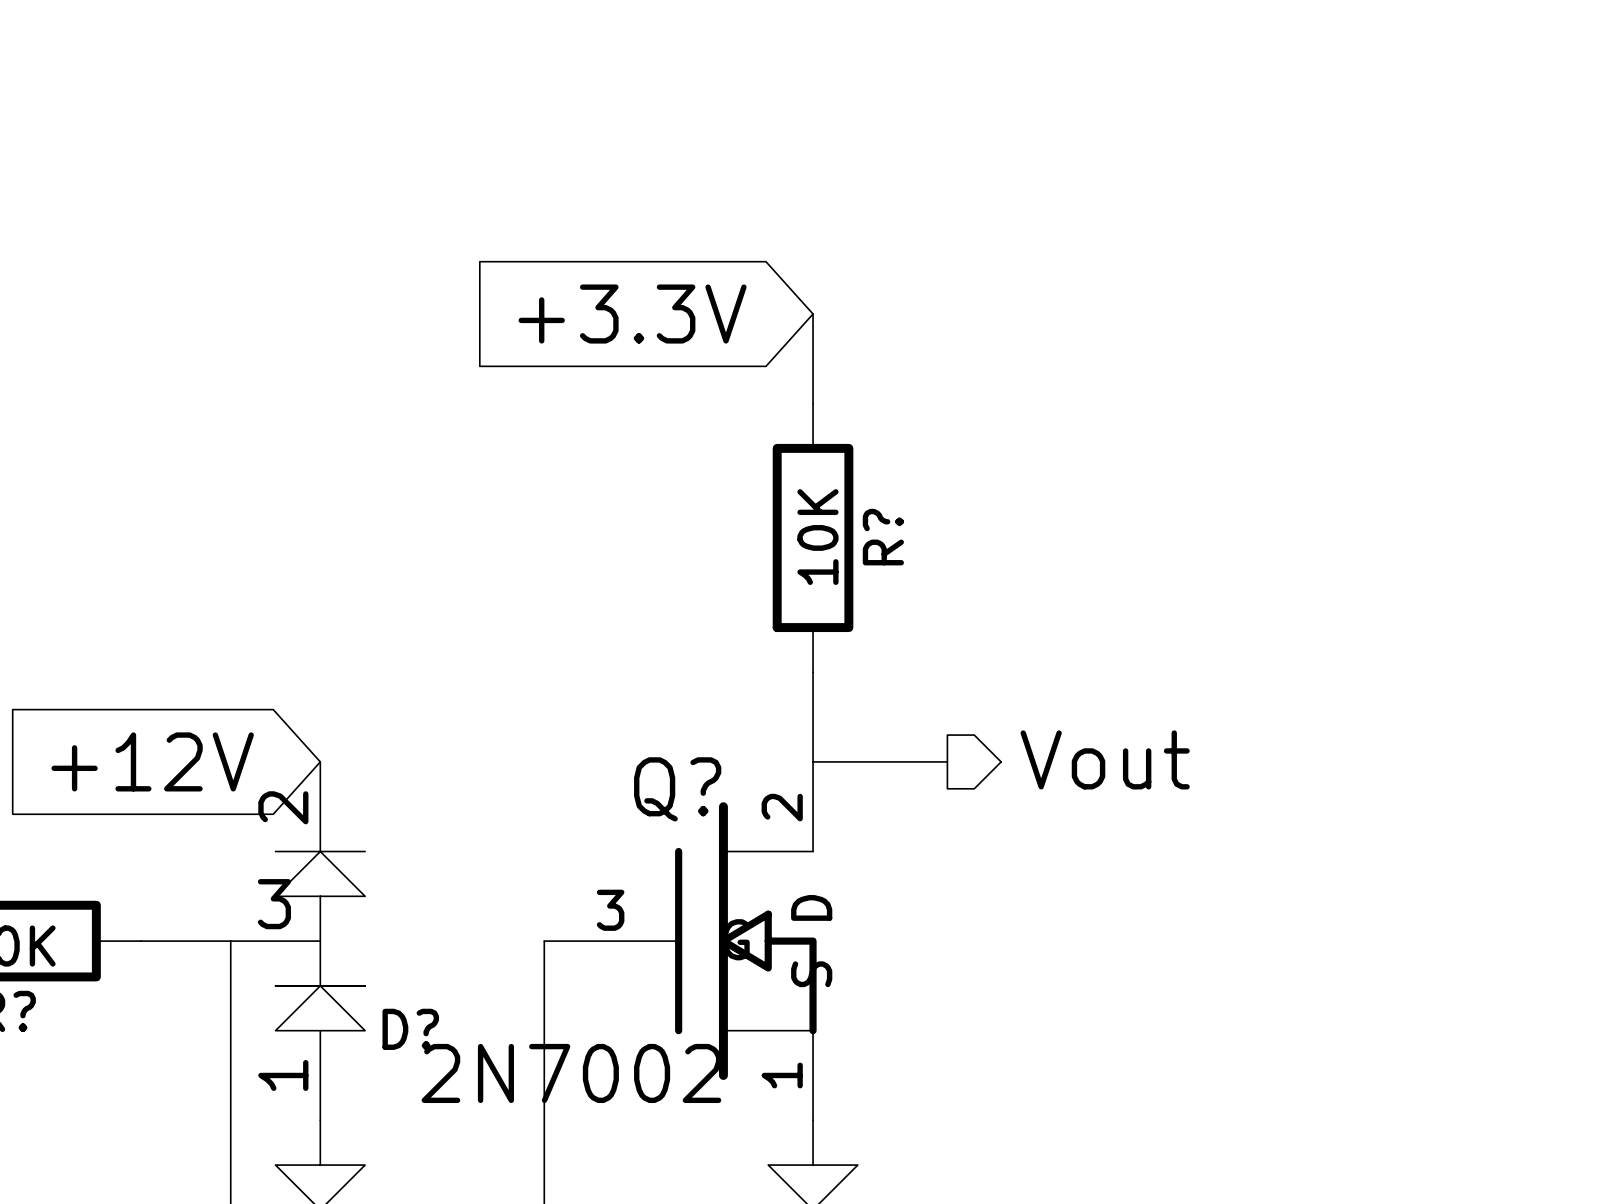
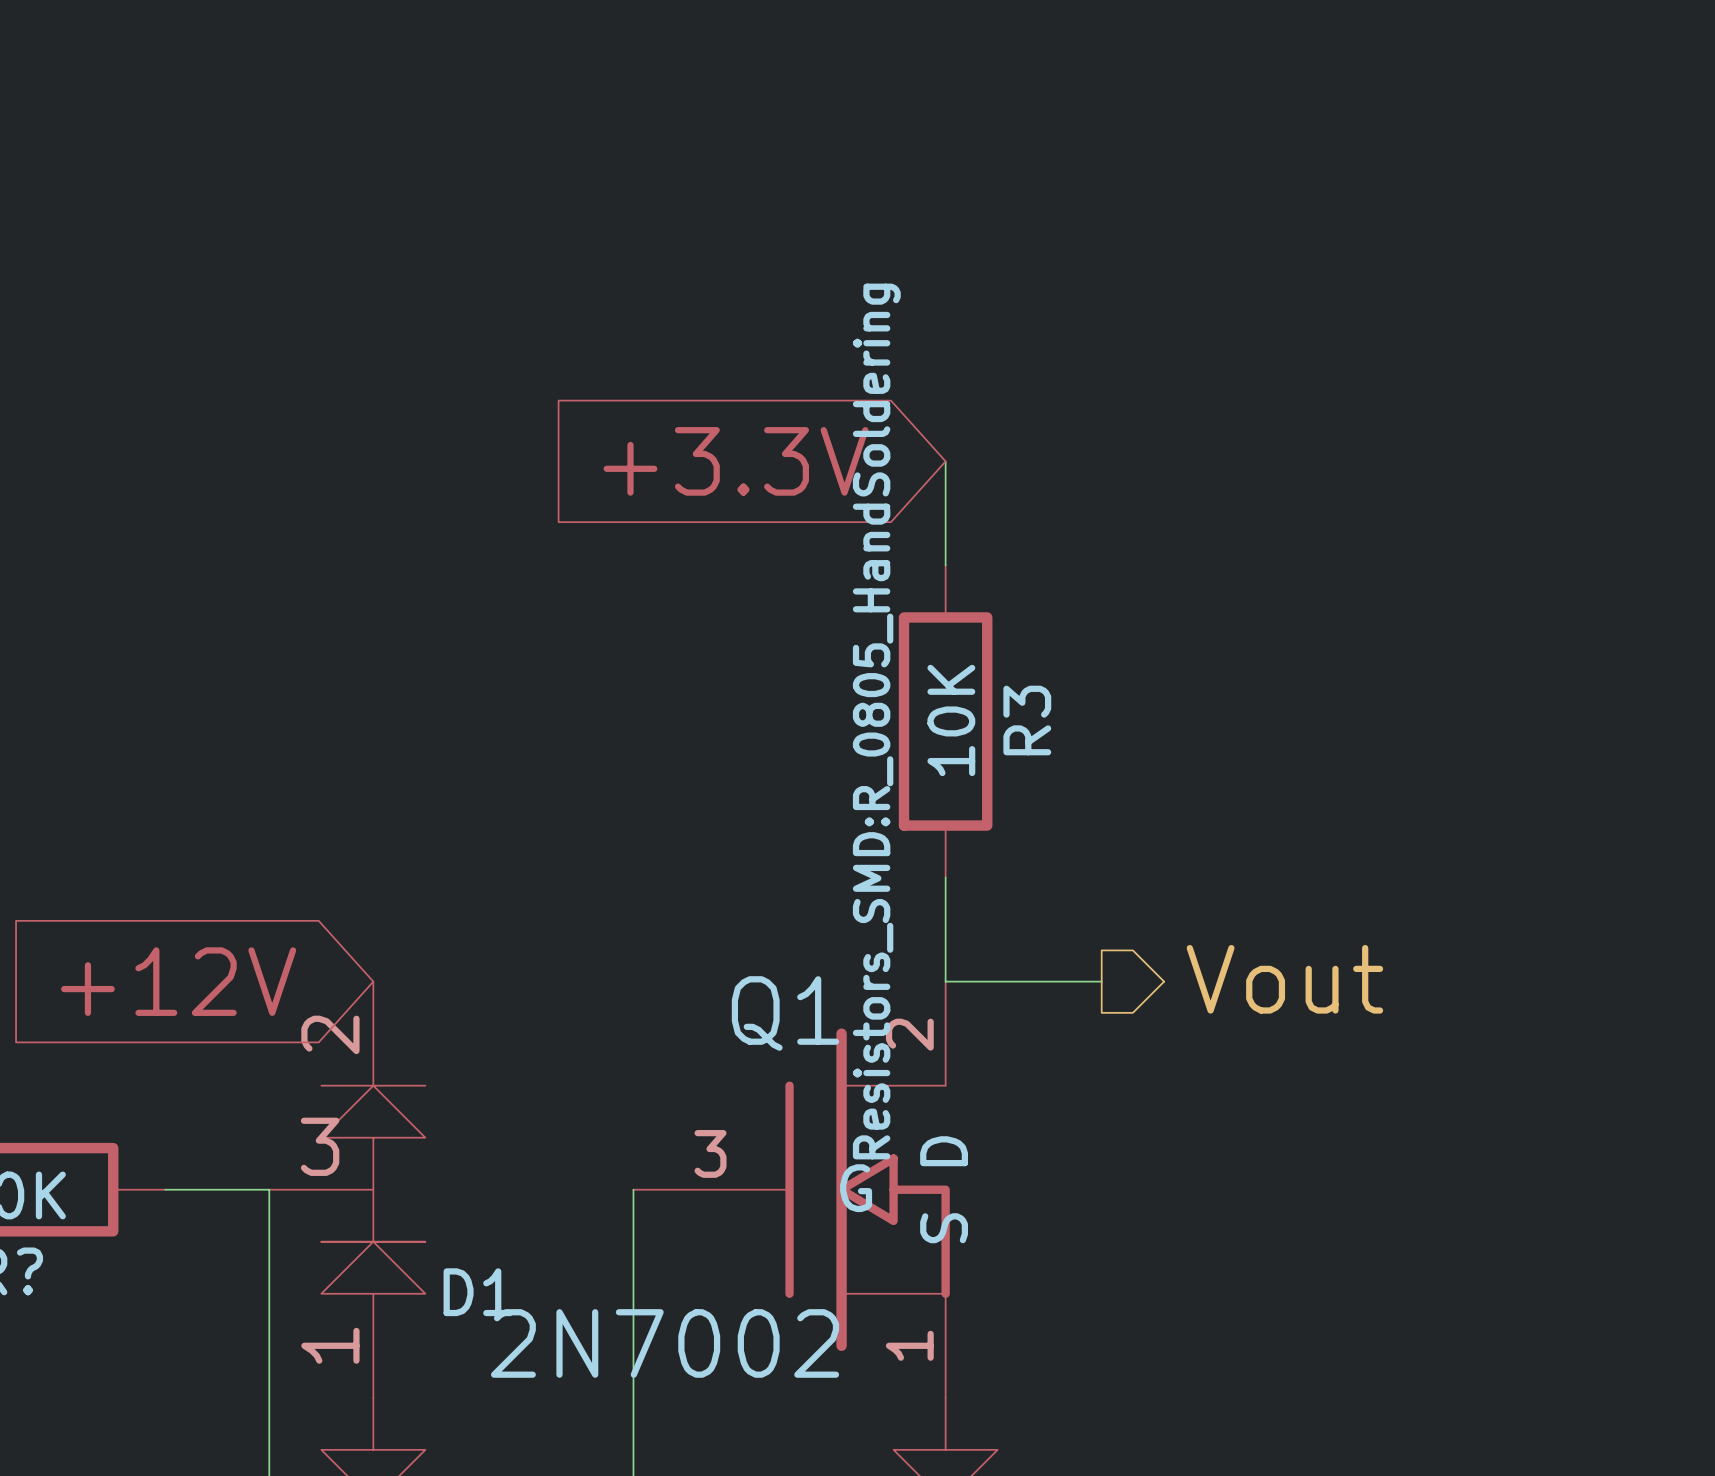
R? text: none -> Resistors_SMD:R_0805_HandSoldering (876, 721)
R? name: R? (883, 537) -> R3 (1027, 720)
Q? name: Q? (677, 789) -> Q1 (785, 1013)
D? name: D? (410, 1029) -> D1 (478, 1292)

